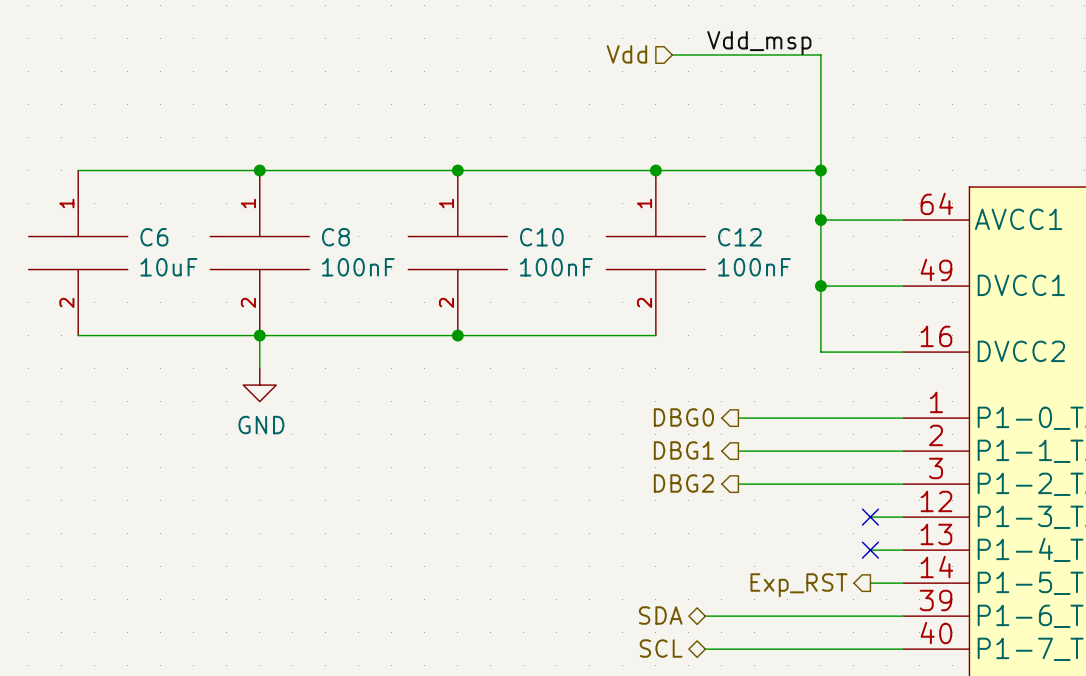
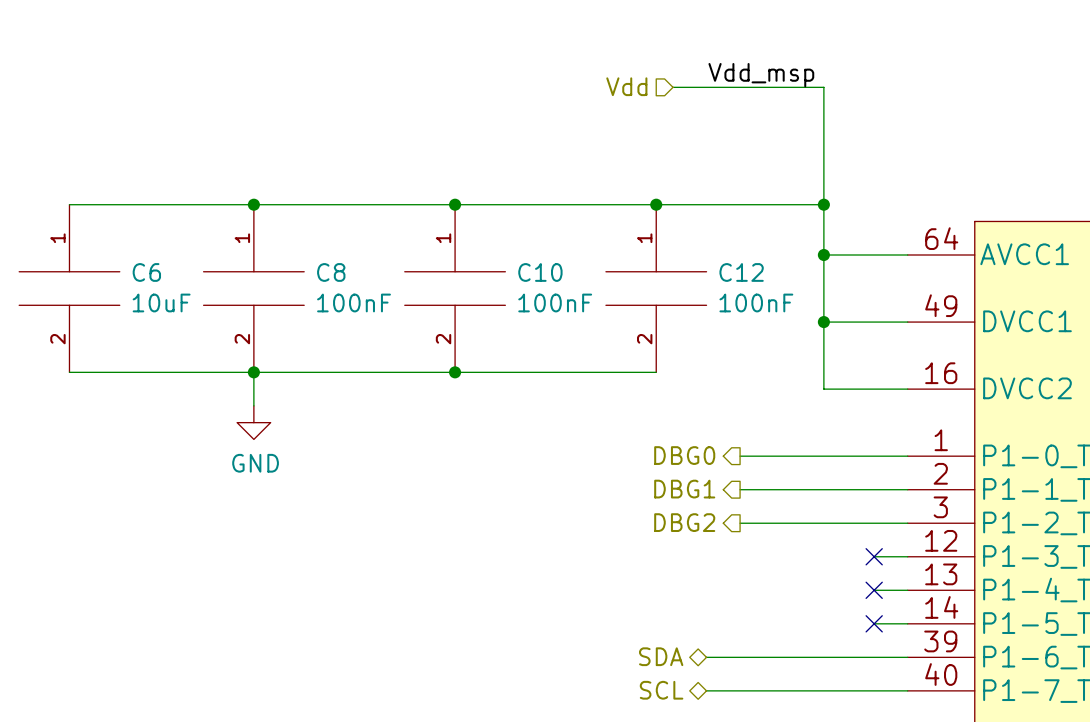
no-connect mark: none -> (874, 623)
hierarchical label: Exp_RST (799, 585) -> none

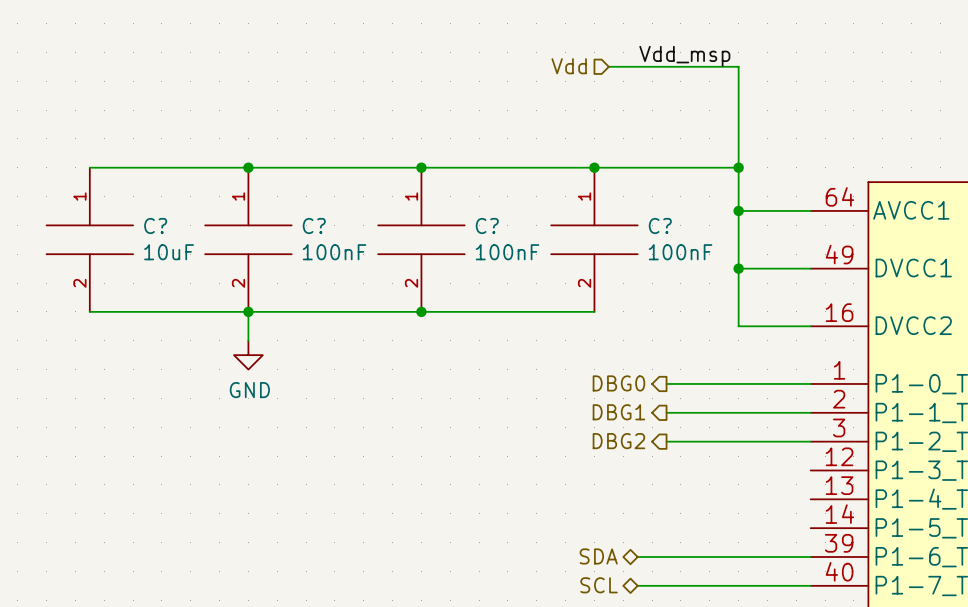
C6 name: C6 (146, 272) -> C? (155, 226)
C8 name: C8 (331, 272) -> C? (314, 226)
C10 name: C10 (540, 272) -> C? (487, 226)
C12 name: C12 (741, 272) -> C? (660, 226)
wire: (874, 556) (907, 556) -> none
no-connect mark: (874, 556) -> none
wire: (874, 590) (907, 590) -> none
no-connect mark: (874, 590) -> none
wire: (874, 623) (907, 623) -> none
no-connect mark: (874, 623) -> none

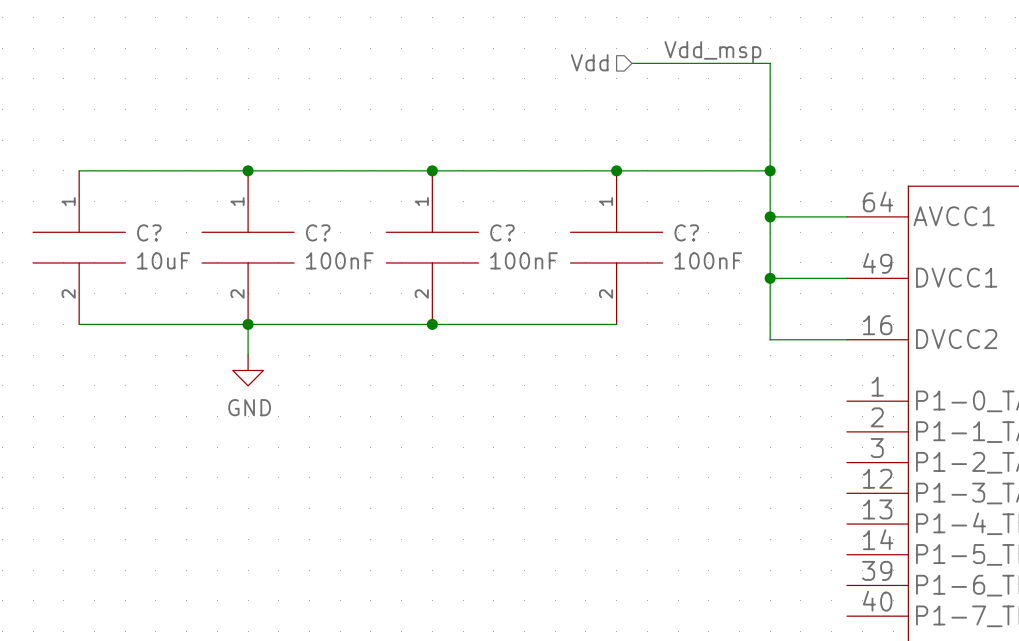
hierarchical label: DBG0 (618, 383) -> none
wire: (666, 383) (810, 383) -> none
hierarchical label: DBG1 (618, 412) -> none
wire: (666, 412) (810, 412) -> none
hierarchical label: DBG2 (618, 441) -> none
wire: (666, 441) (810, 441) -> none
hierarchical label: SDA (598, 556) -> none
wire: (637, 557) (810, 557) -> none
hierarchical label: SCL (599, 585) -> none
wire: (637, 585) (810, 585) -> none

